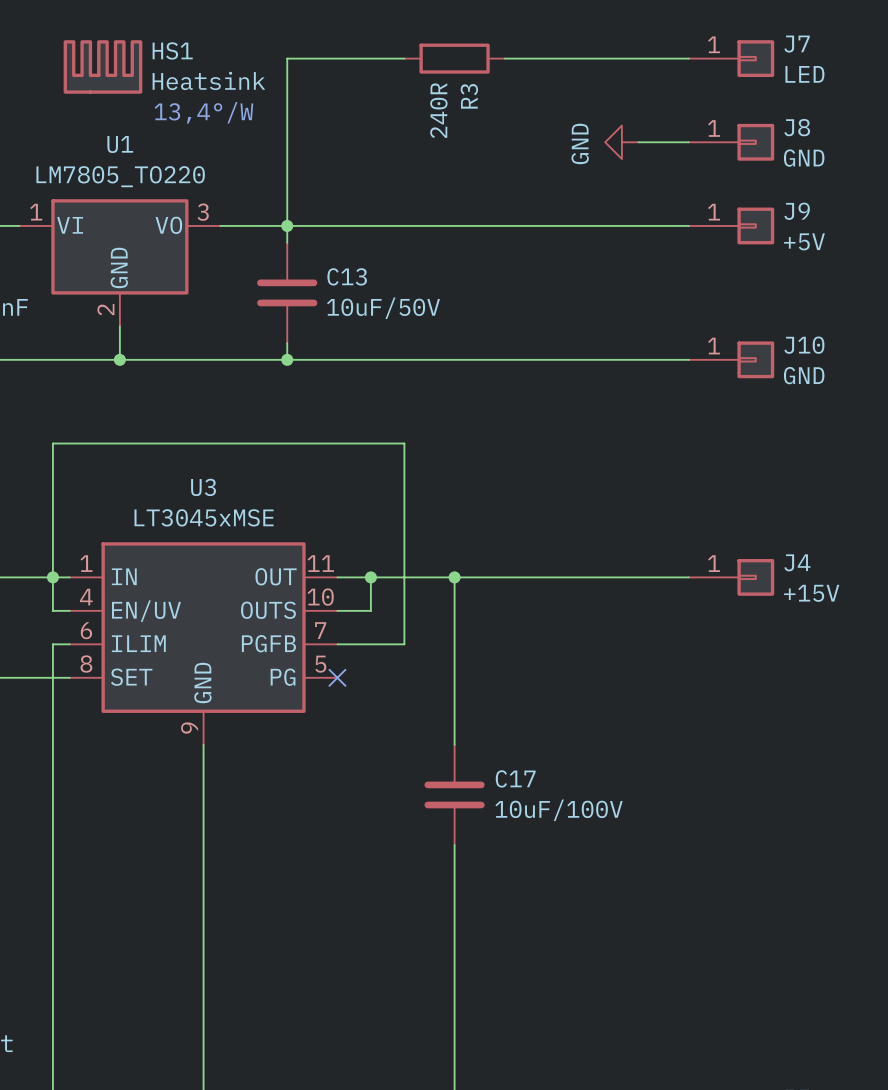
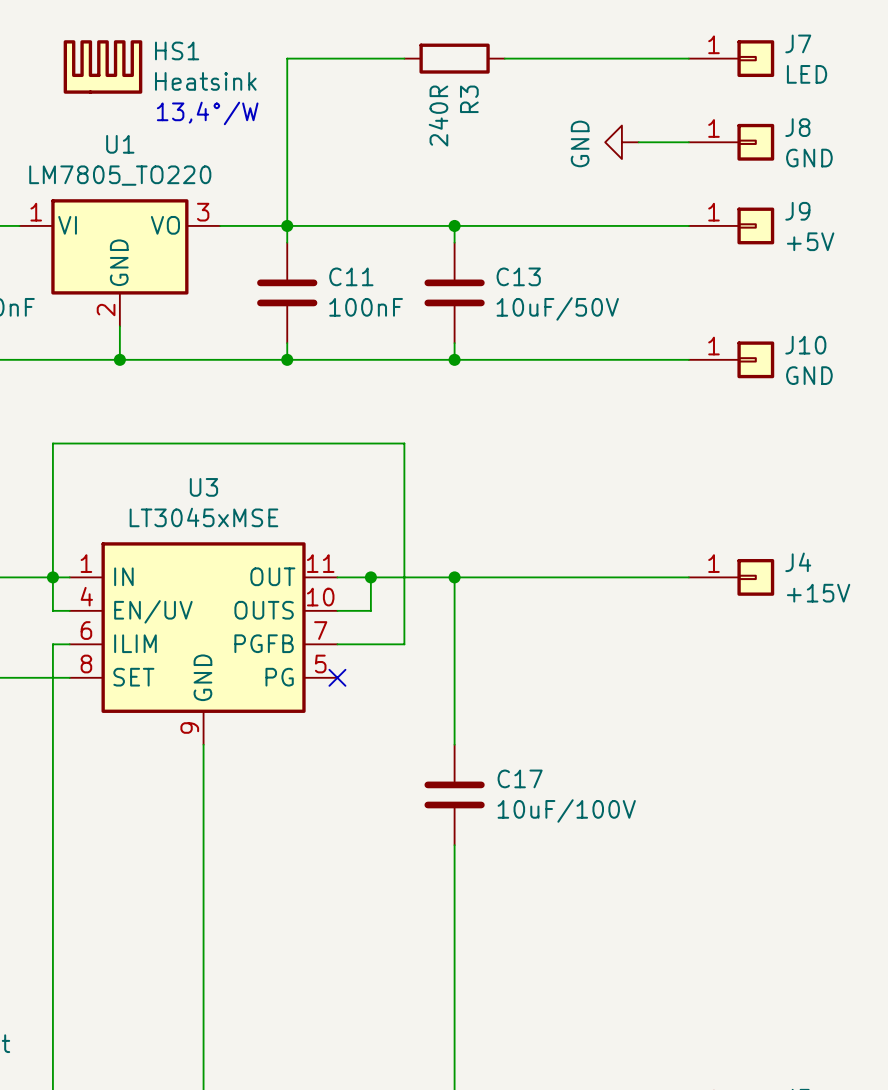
wire: none -> (454, 225) (454, 242)
junction: none -> (454, 225)
C13 name: C13 (347, 276) -> C11 (351, 276)
C13: none -> 10uF/50V (454, 292)
C13 value: 10uF/50V (383, 308) -> 100nF (366, 307)
wire: none -> (454, 343) (454, 359)
junction: none -> (454, 359)

